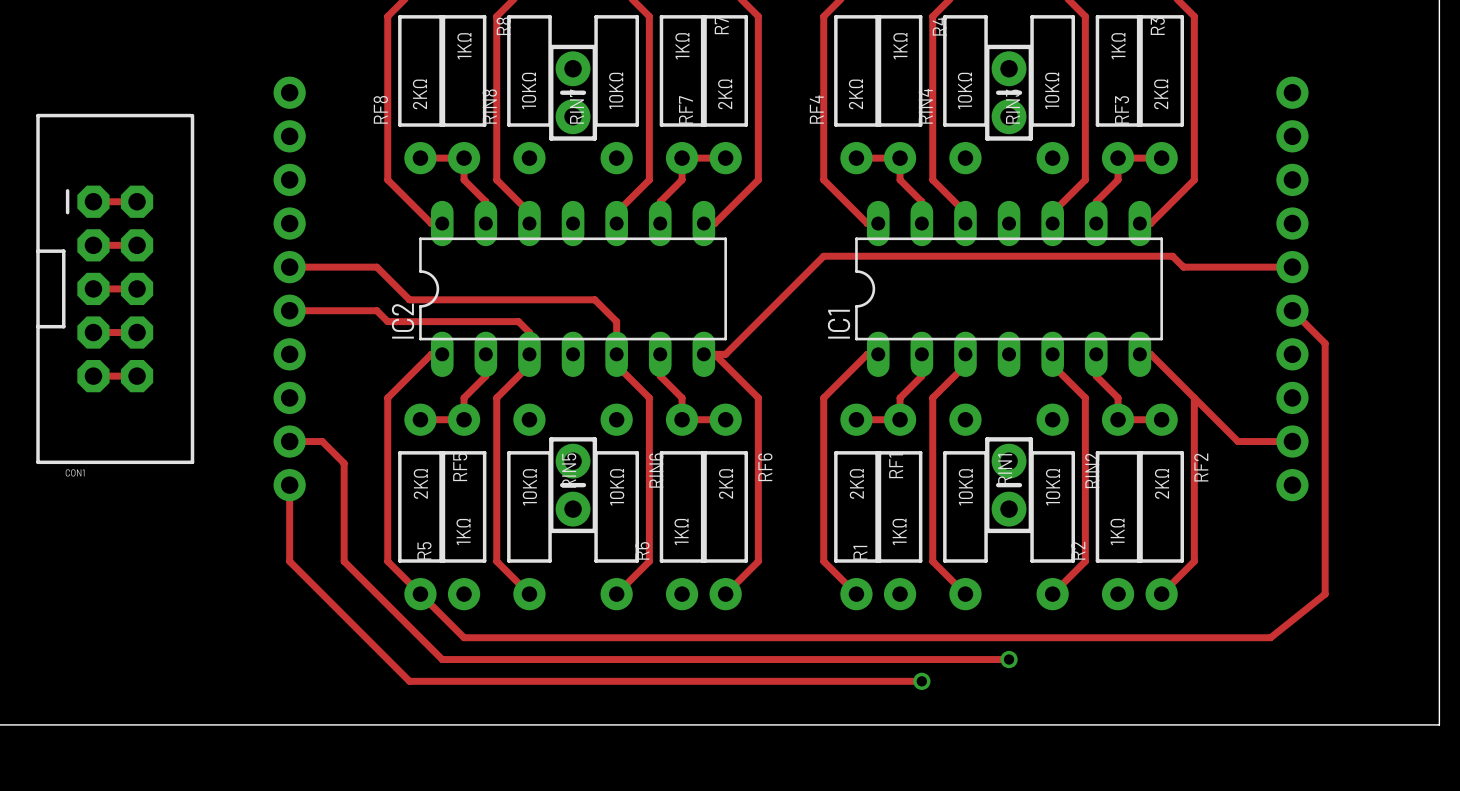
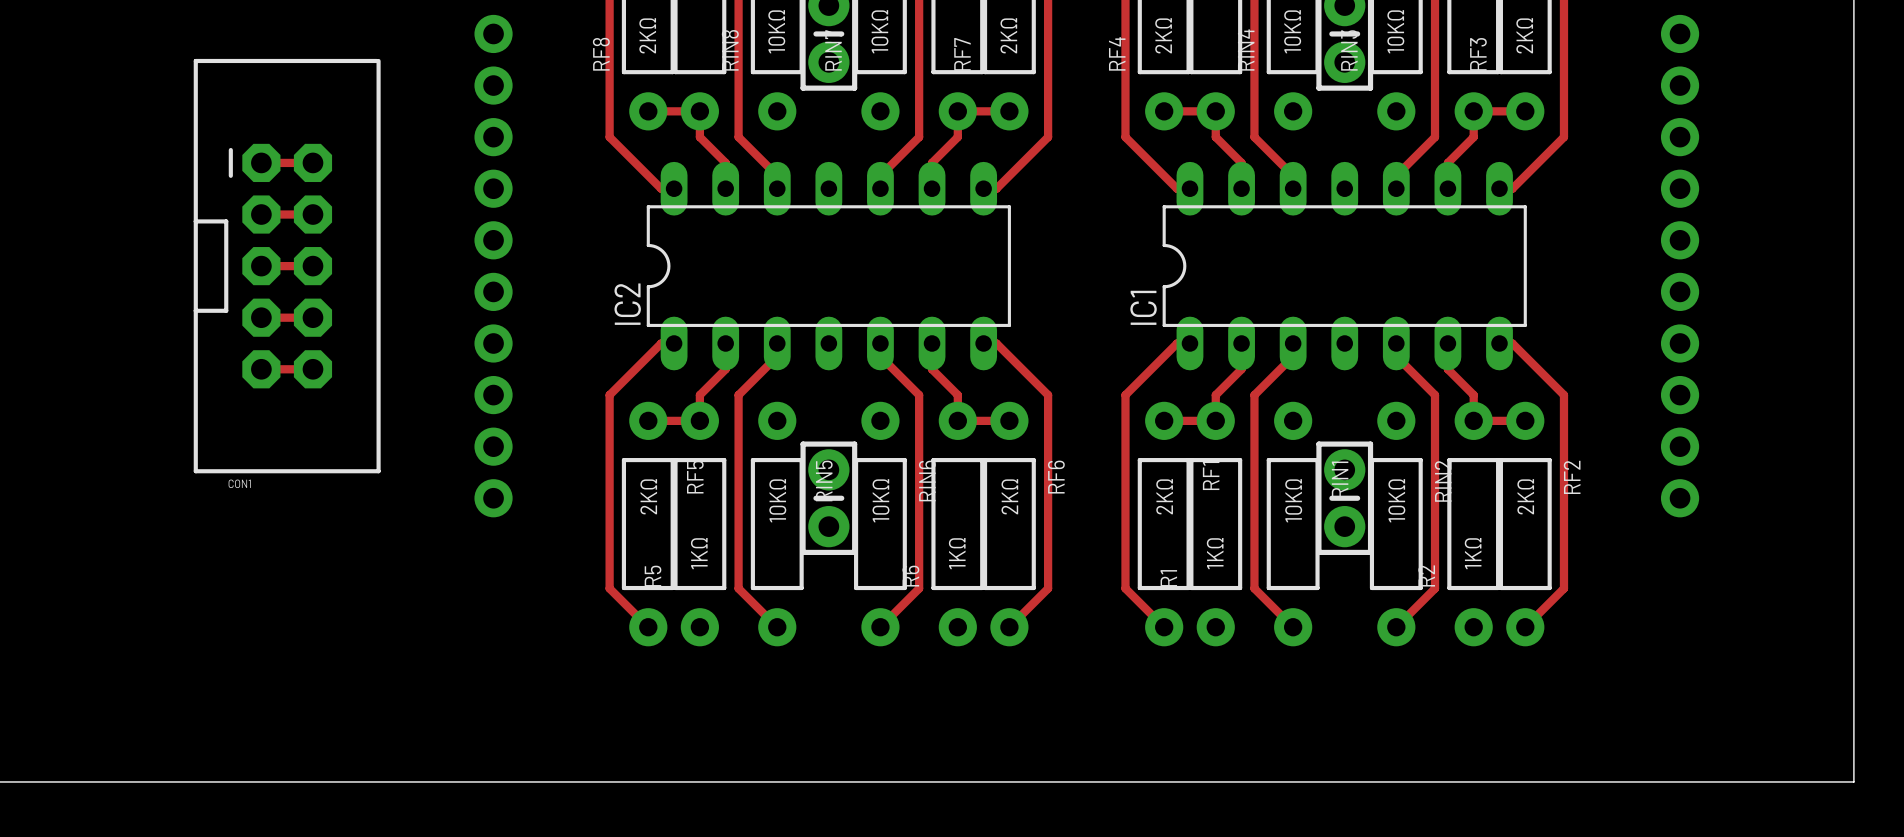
track: (289, 267) (376, 267) (409, 299) (594, 299) (616, 321) (616, 354) -> none
track: (1292, 267) (1183, 267) (1172, 256) (823, 256) (725, 354) (714, 354) -> none
track: (289, 310) (376, 310) (387, 321) (518, 321) (529, 332) (529, 354) -> none
track: (1292, 310) (1325, 343) (1325, 594) (1270, 637) (464, 637) (420, 594) -> none
track: (1194, 397) (1237, 441) (1292, 441) -> none
track: (289, 441) (322, 441) (344, 463) (344, 561) (442, 659) (1009, 659) -> none
track: (289, 485) (289, 561) (409, 681) (921, 681) -> none
via: (1009, 659) -> none
via: (921, 681) -> none

